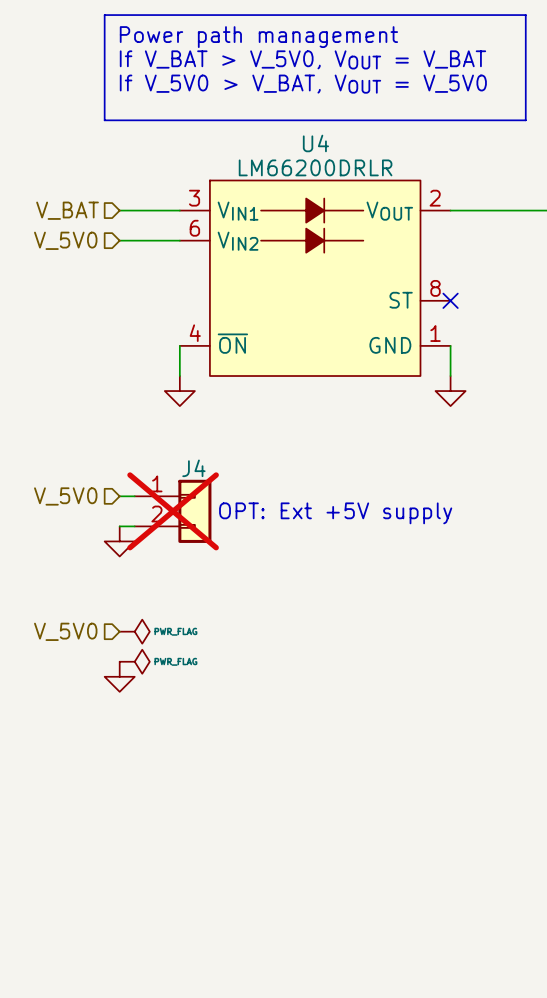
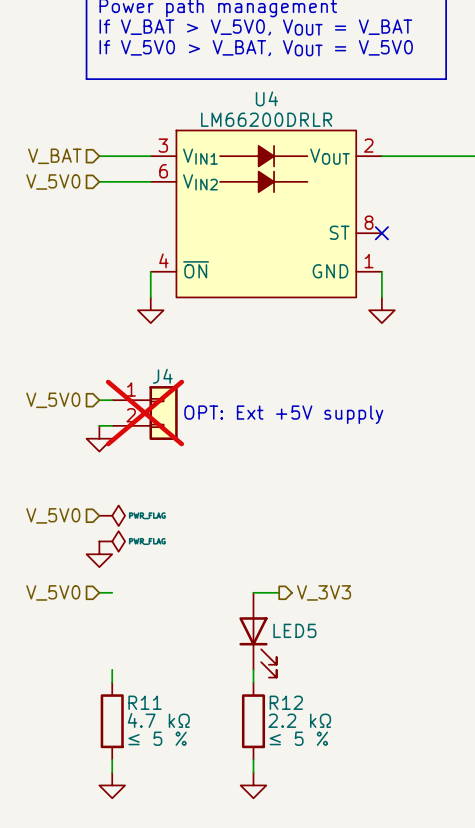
wire: none -> (99, 592) (112, 592)
wire: none -> (253, 592) (279, 592)
hierarchical label: none -> V_5V0 (53, 592)
hierarchical label: none -> V_3V3 (324, 592)
LED5: none -> (257, 635)
wire: none -> (112, 669) (112, 682)
wire: none -> (253, 669) (253, 682)
R11: none -> 4.7 kΩ (112, 721)
R12: none -> 2.2 kΩ (253, 721)
wire: none -> (112, 759) (112, 772)
wire: none -> (253, 759) (253, 772)
power symbol: none -> (112, 785)
power symbol: none -> (253, 785)

